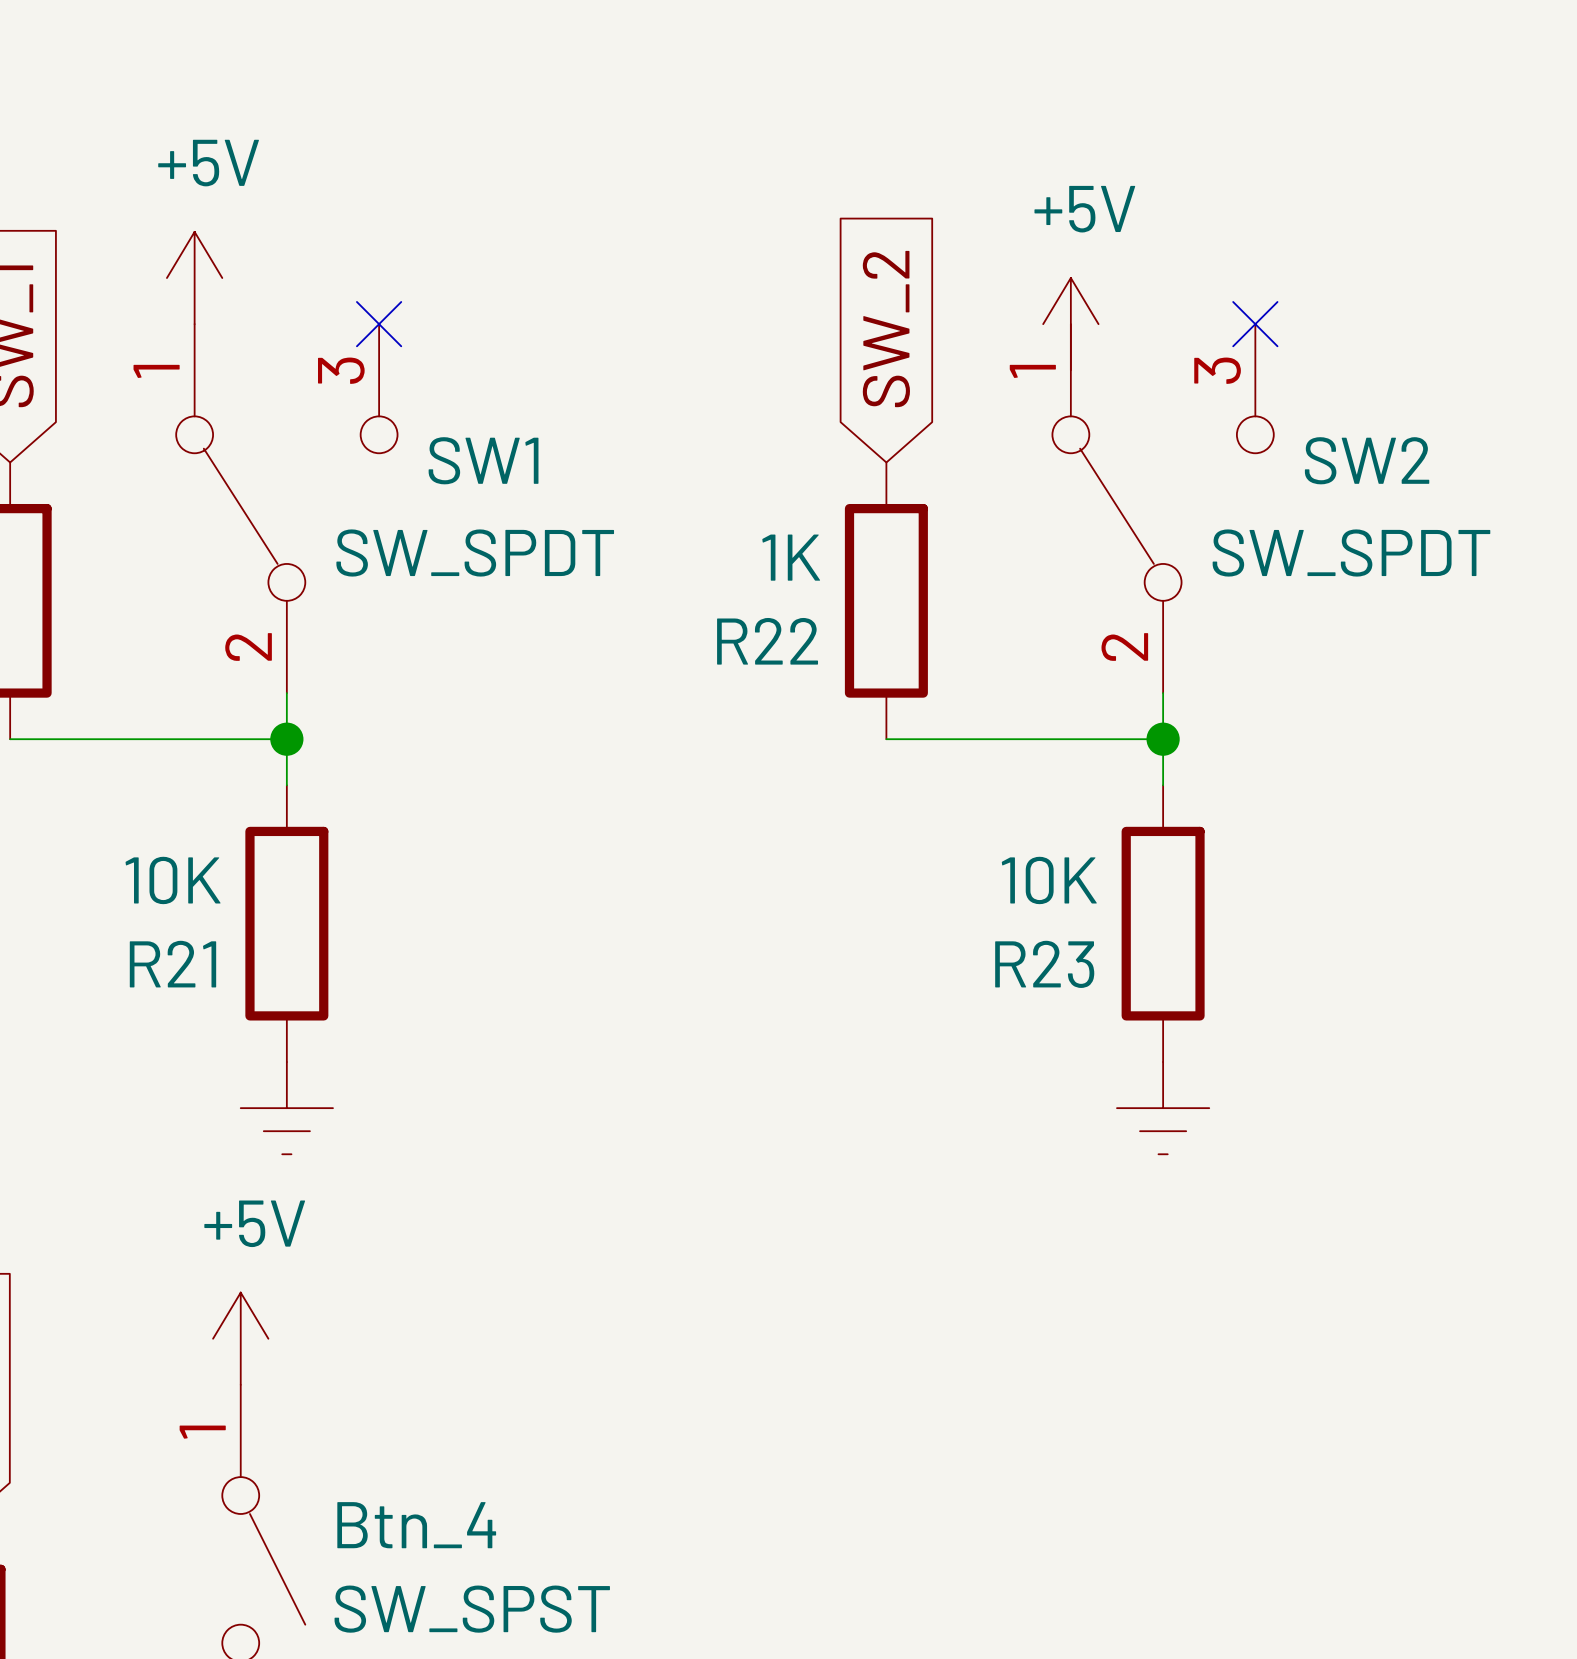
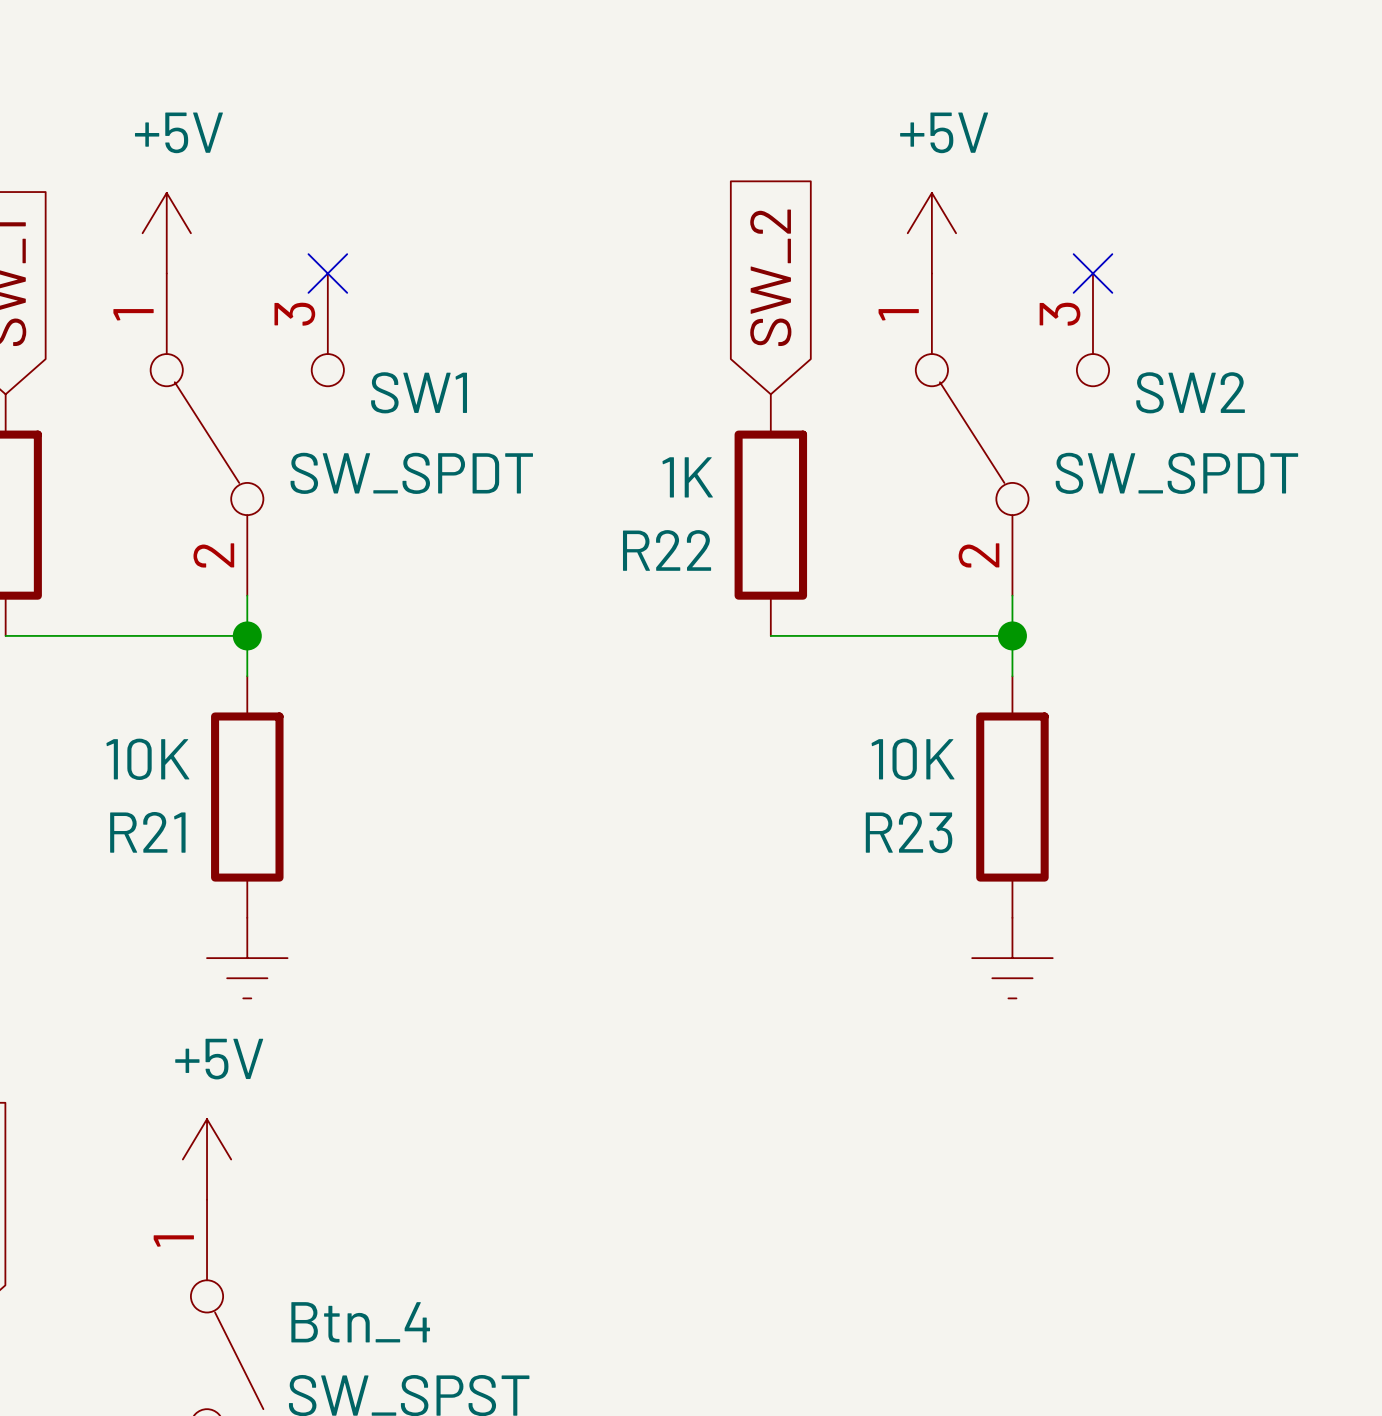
power symbol position: +5V (1070, 324) -> +5V (931, 233)

